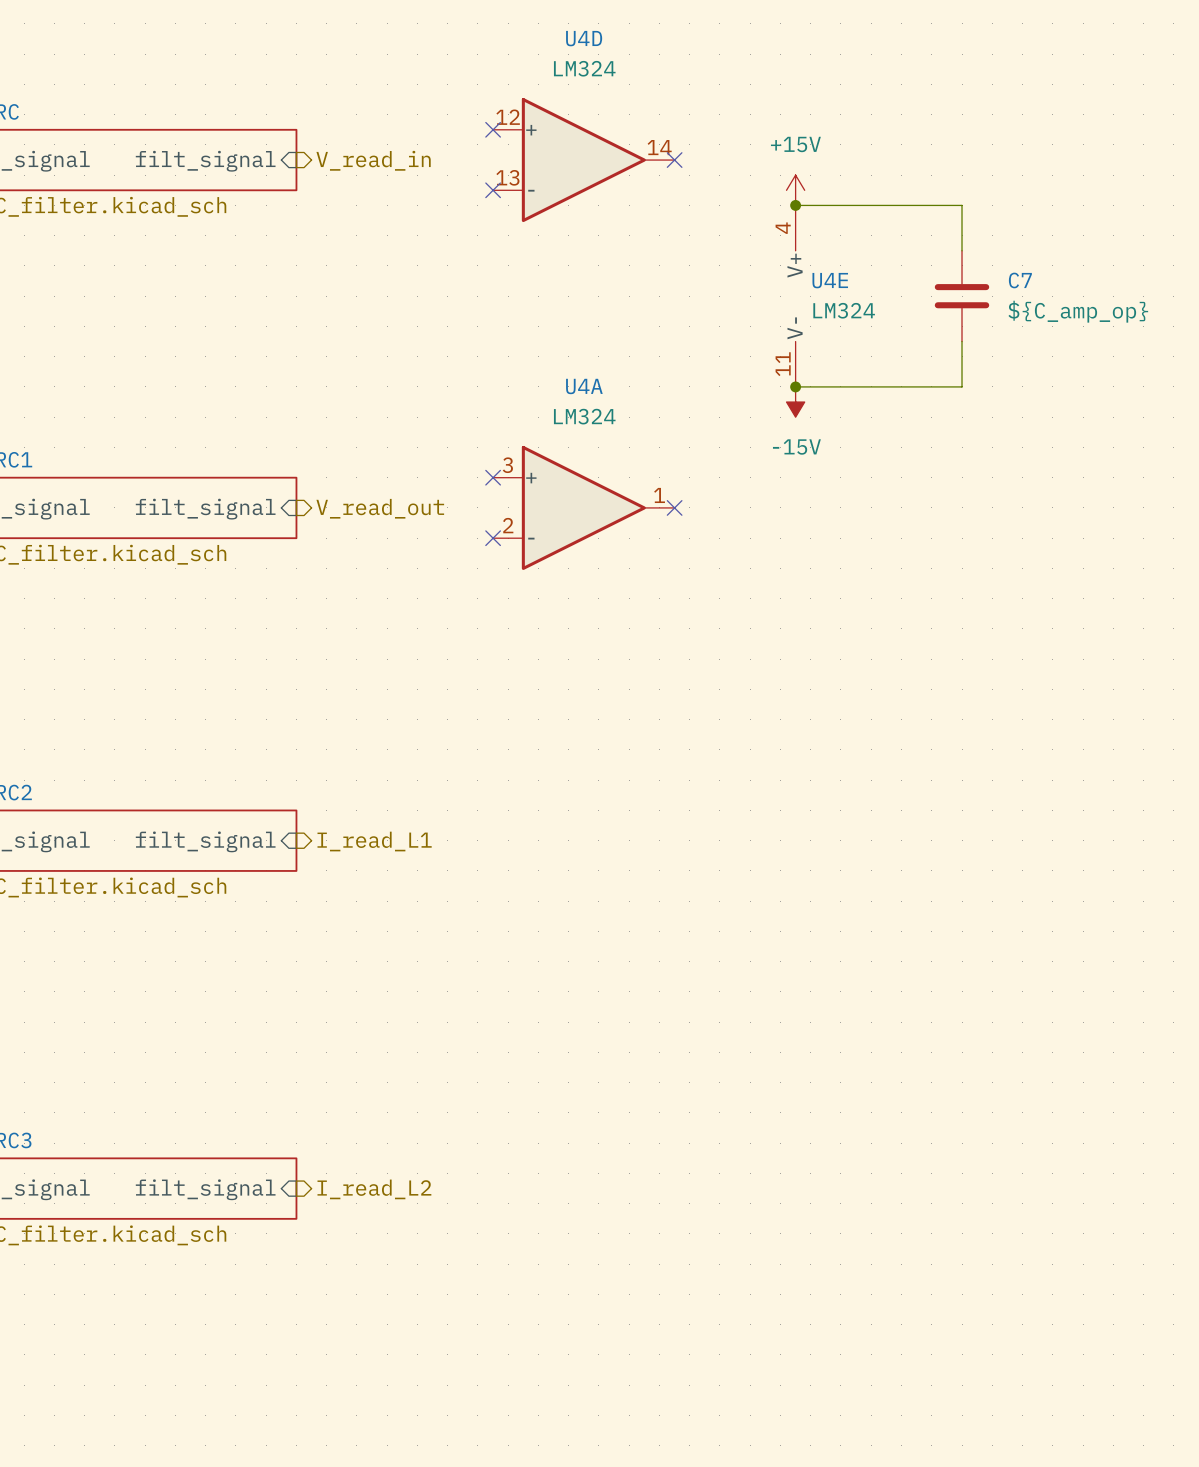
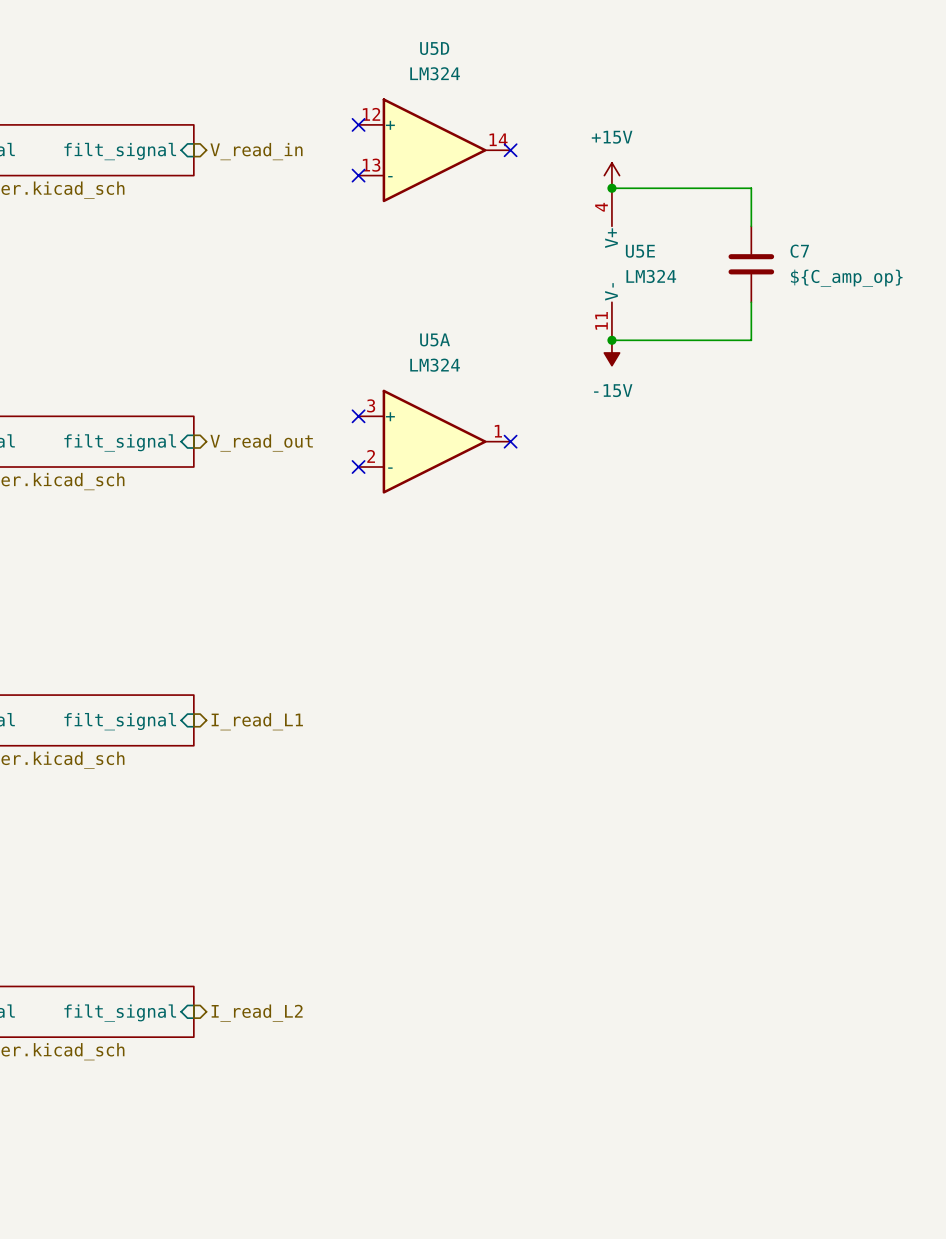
U4D name: U4D (584, 38) -> U5D (434, 48)
U4E name: U4E (830, 280) -> U5E (640, 251)
U4A name: U4A (584, 386) -> U5A (435, 339)

